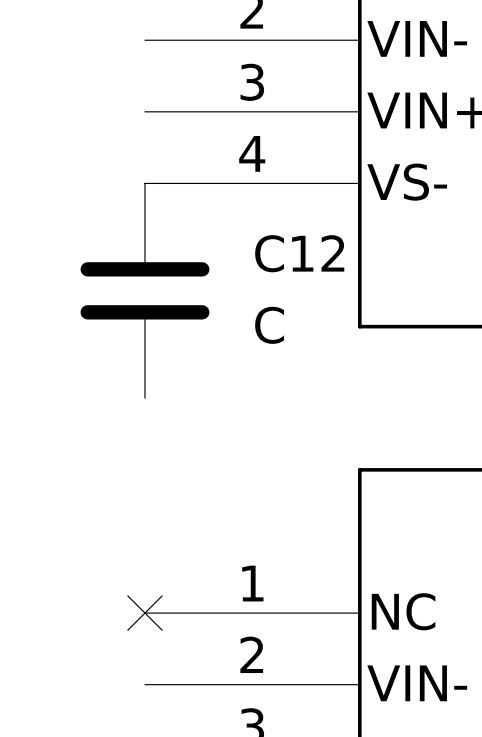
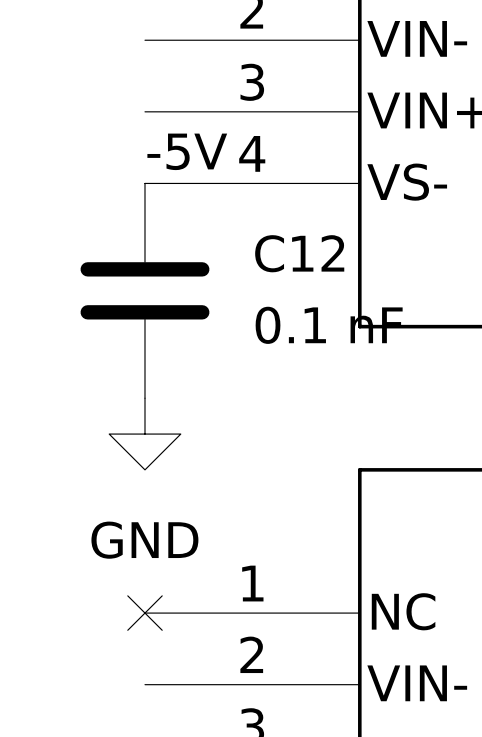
label: none -> -5V (187, 151)
C12 value: C (269, 325) -> 0.1 nF (329, 325)
power symbol: none -> GND (144, 434)

